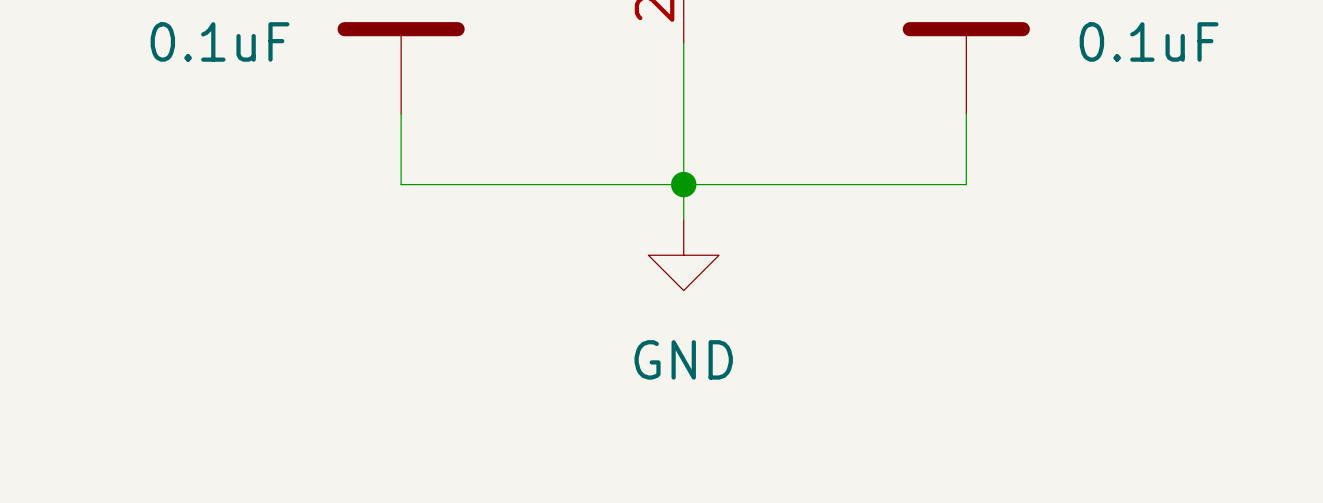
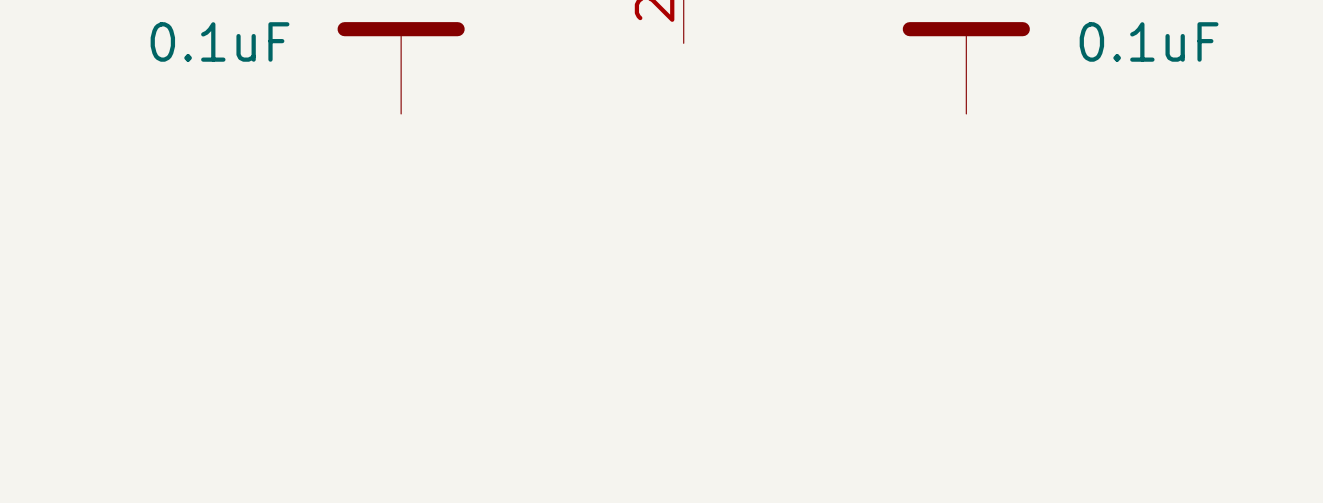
wire: (683, 43) (683, 219) -> none
wire: (401, 113) (401, 184) (966, 184) (966, 113) -> none
junction: (683, 184) -> none
power symbol: GND (683, 255) -> none

